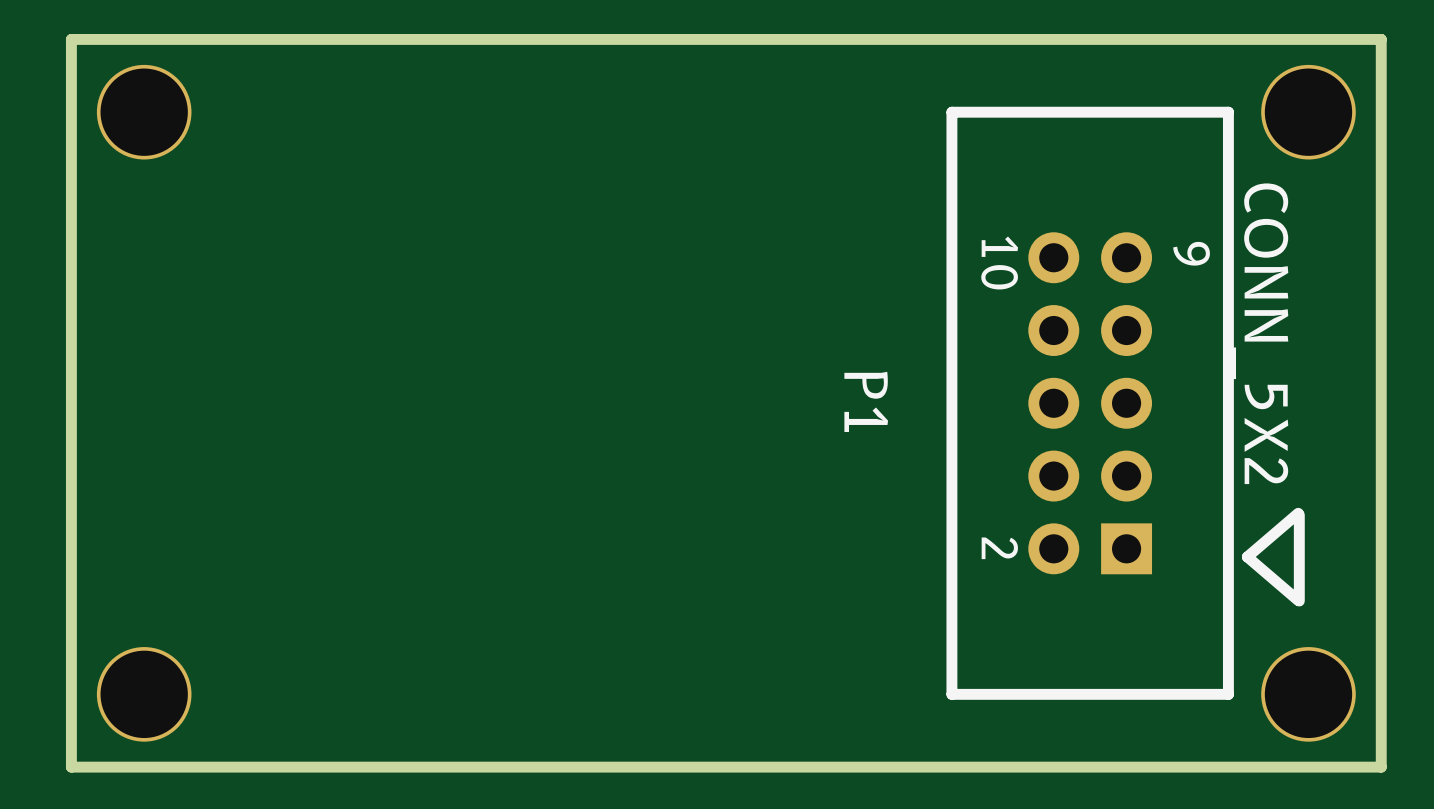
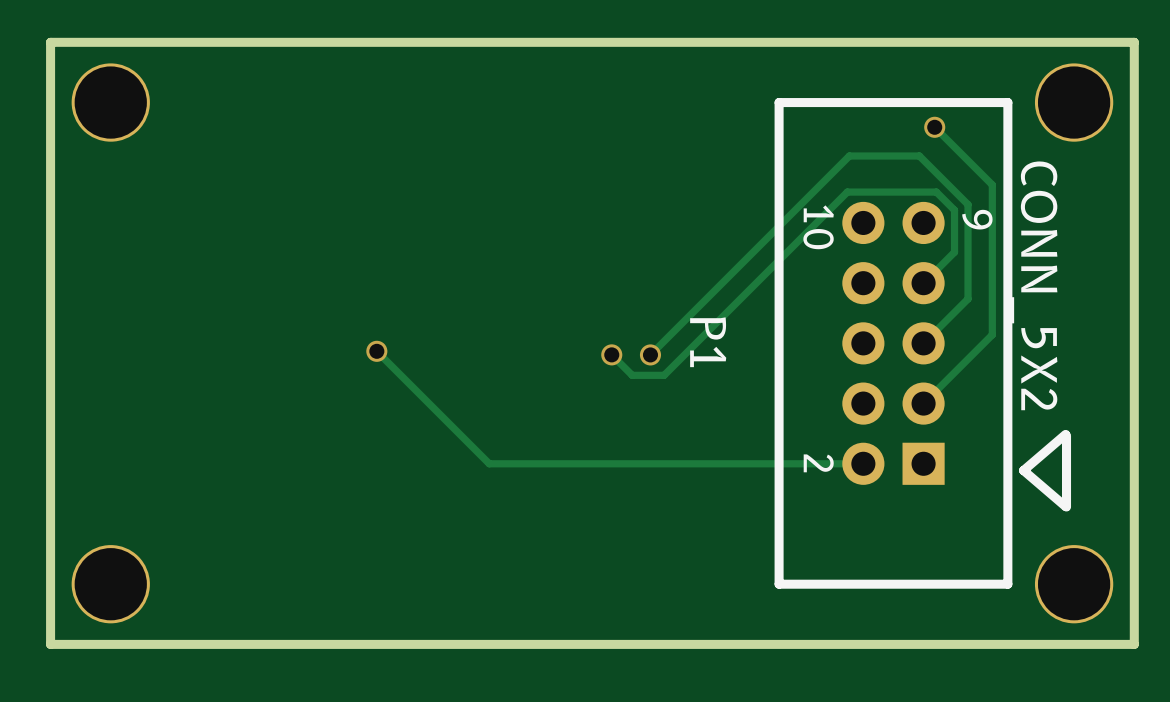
track: none -> (934, 127) (992, 184) (992, 334) (923, 403)
via: none -> (934, 127)
track: none -> (923, 283) (954, 252) (954, 210) (936, 192) (847, 192) (664, 375) (632, 375) (611, 354)
track: none -> (923, 343) (968, 298) (968, 204) (919, 156) (849, 156) (650, 354)
track: none -> (376, 351) (489, 463) (863, 463)
via: none -> (376, 351)
via: none -> (611, 354)
via: none -> (650, 354)

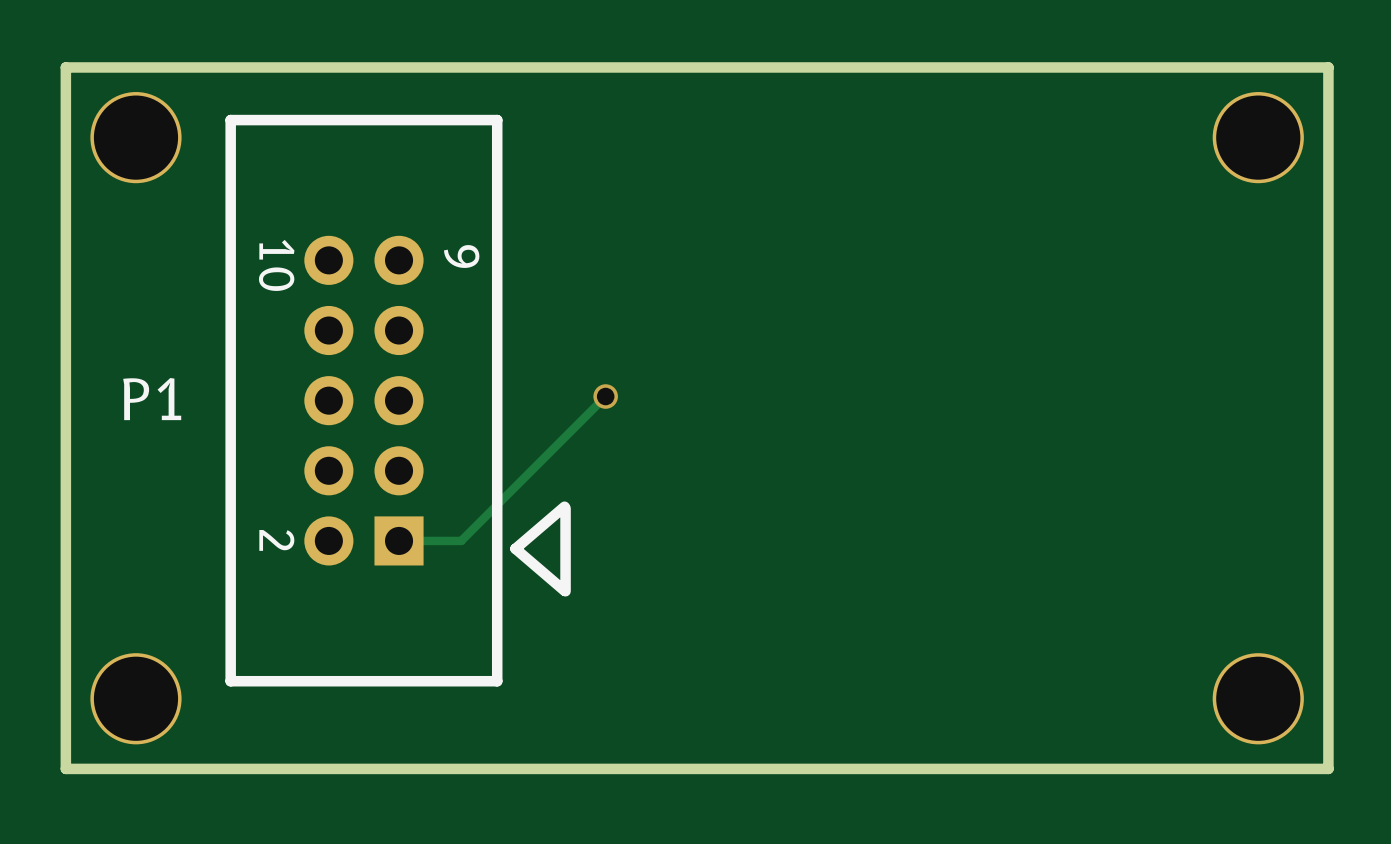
track: (934, 127) (992, 184) (992, 334) (923, 403) -> none
via: (934, 127) -> none
track: (923, 283) (954, 252) (954, 210) (936, 192) (847, 192) (664, 375) (632, 375) (611, 354) -> none
P1 value: CONN_5X2 (1033, 285) -> none
track: none -> (605, 396) (461, 540) (399, 540)
via: none -> (605, 396)
P1 name rotation: 0° (708, 342) -> 90° counterclockwise (152, 399)
P1 position: (922, 343) -> (398, 400)
track: (923, 343) (968, 298) (968, 204) (919, 156) (849, 156) (650, 354) -> none
track: (376, 351) (489, 463) (863, 463) -> none
via: (376, 351) -> none
via: (611, 354) -> none
via: (650, 354) -> none

